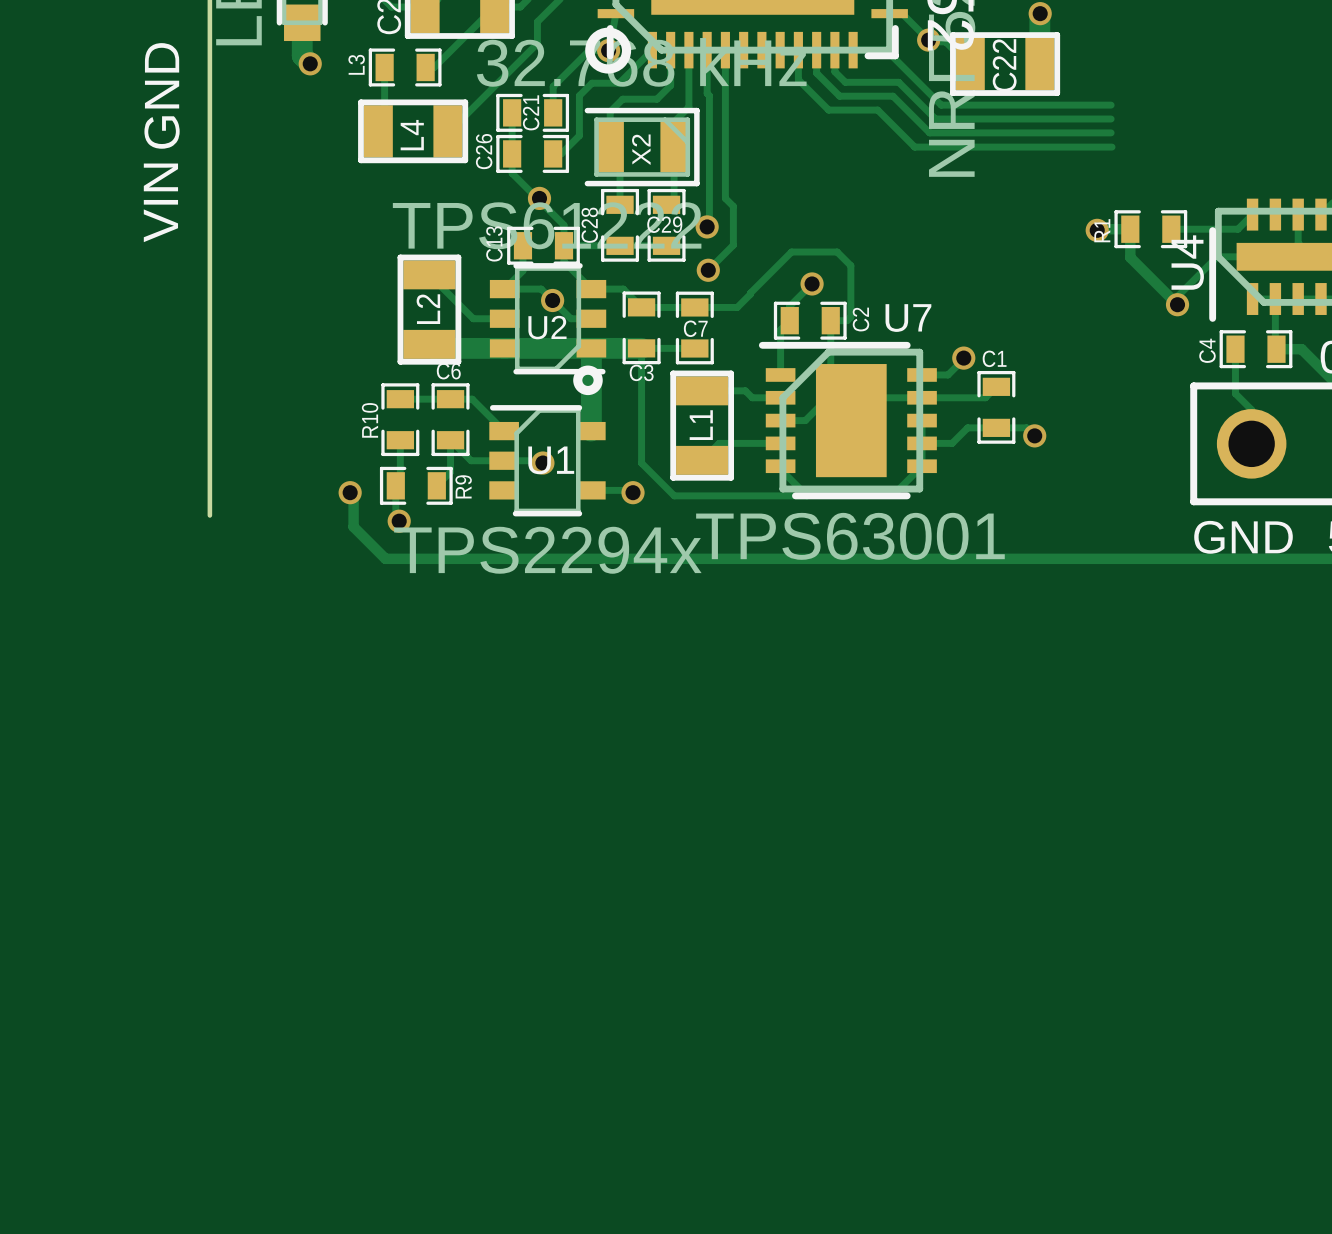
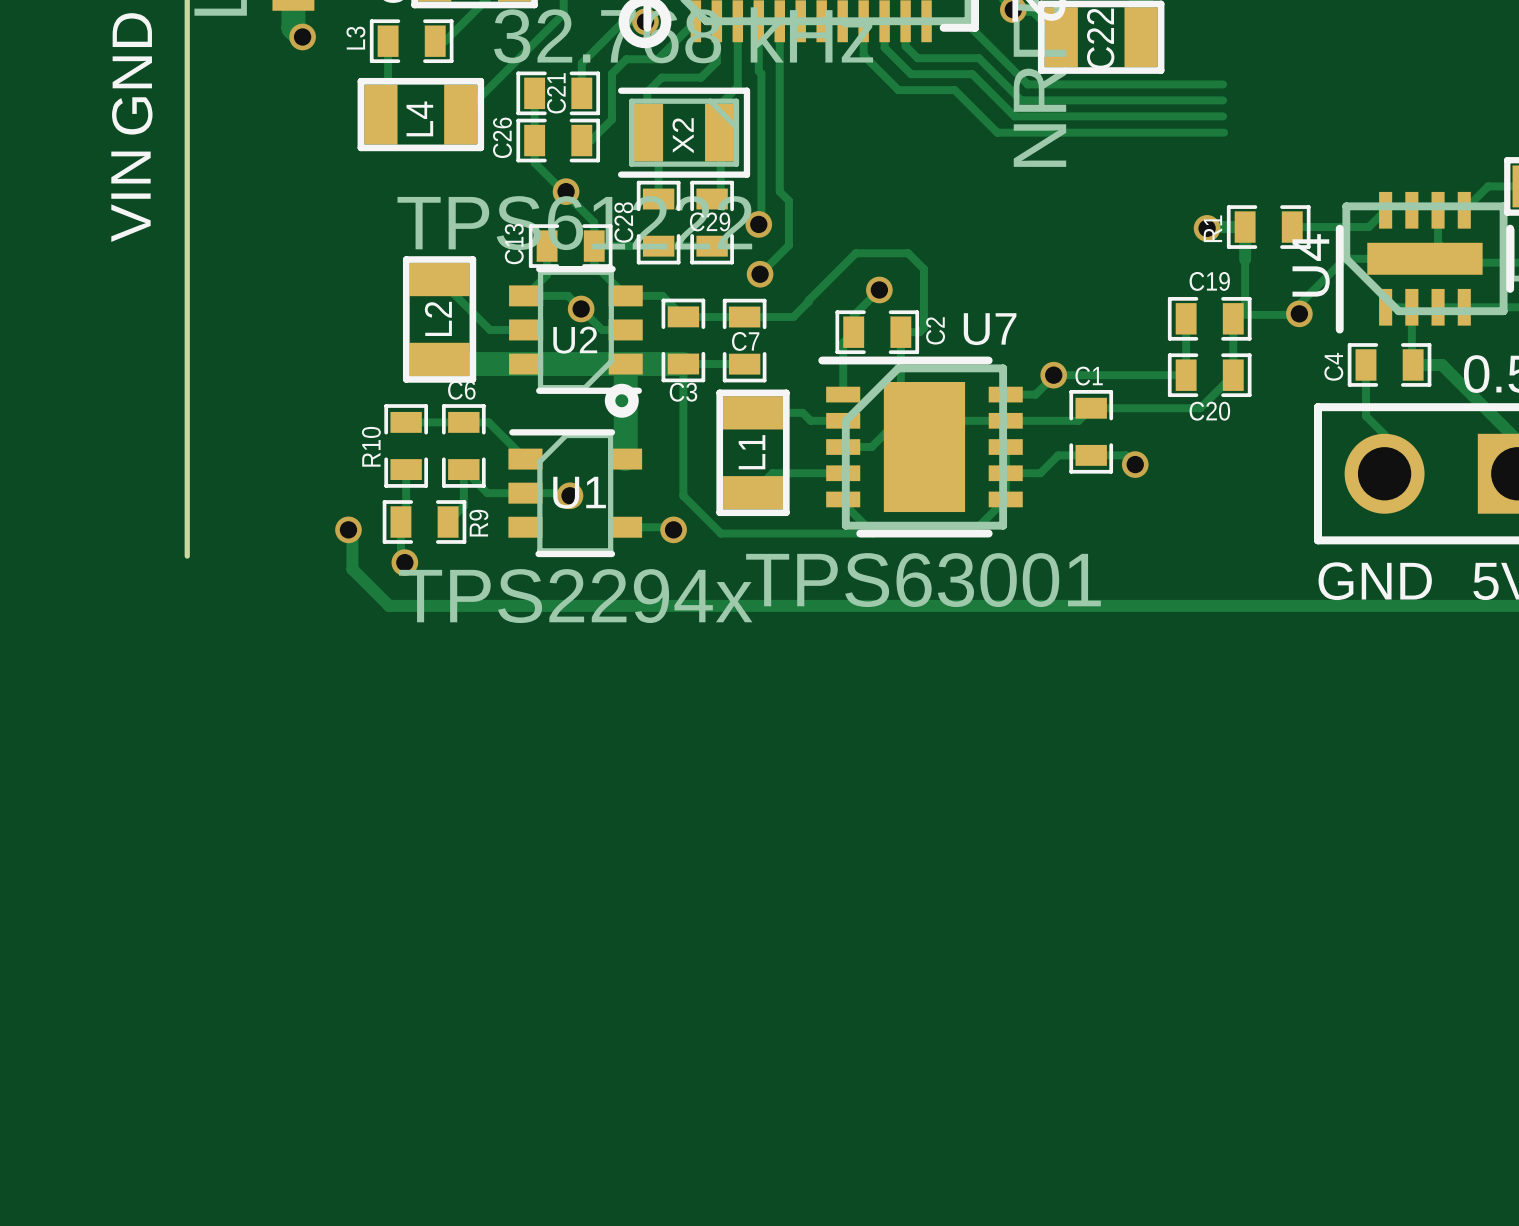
track: (1130, 257) (1177, 304) -> (1237, 314) (1299, 314)
track: none -> (1245, 259) (1245, 306) (1233, 318) (1233, 375) (1200, 408) (1091, 408)
track: none -> (1186, 318) (1186, 375) (1055, 375)
C19: none -> (1209, 318)
C20: none -> (1209, 375)

